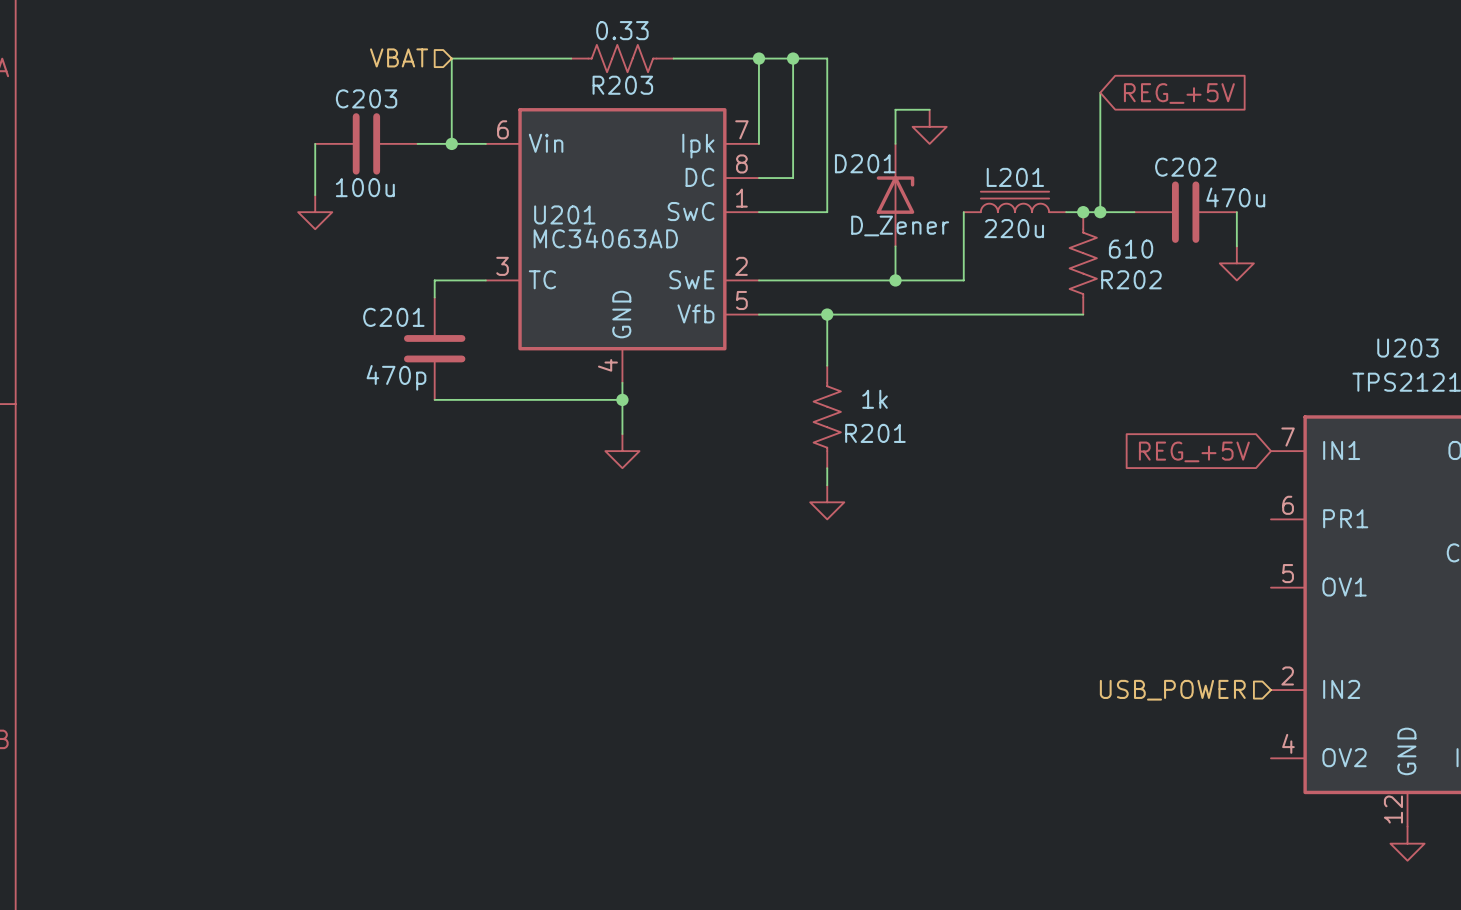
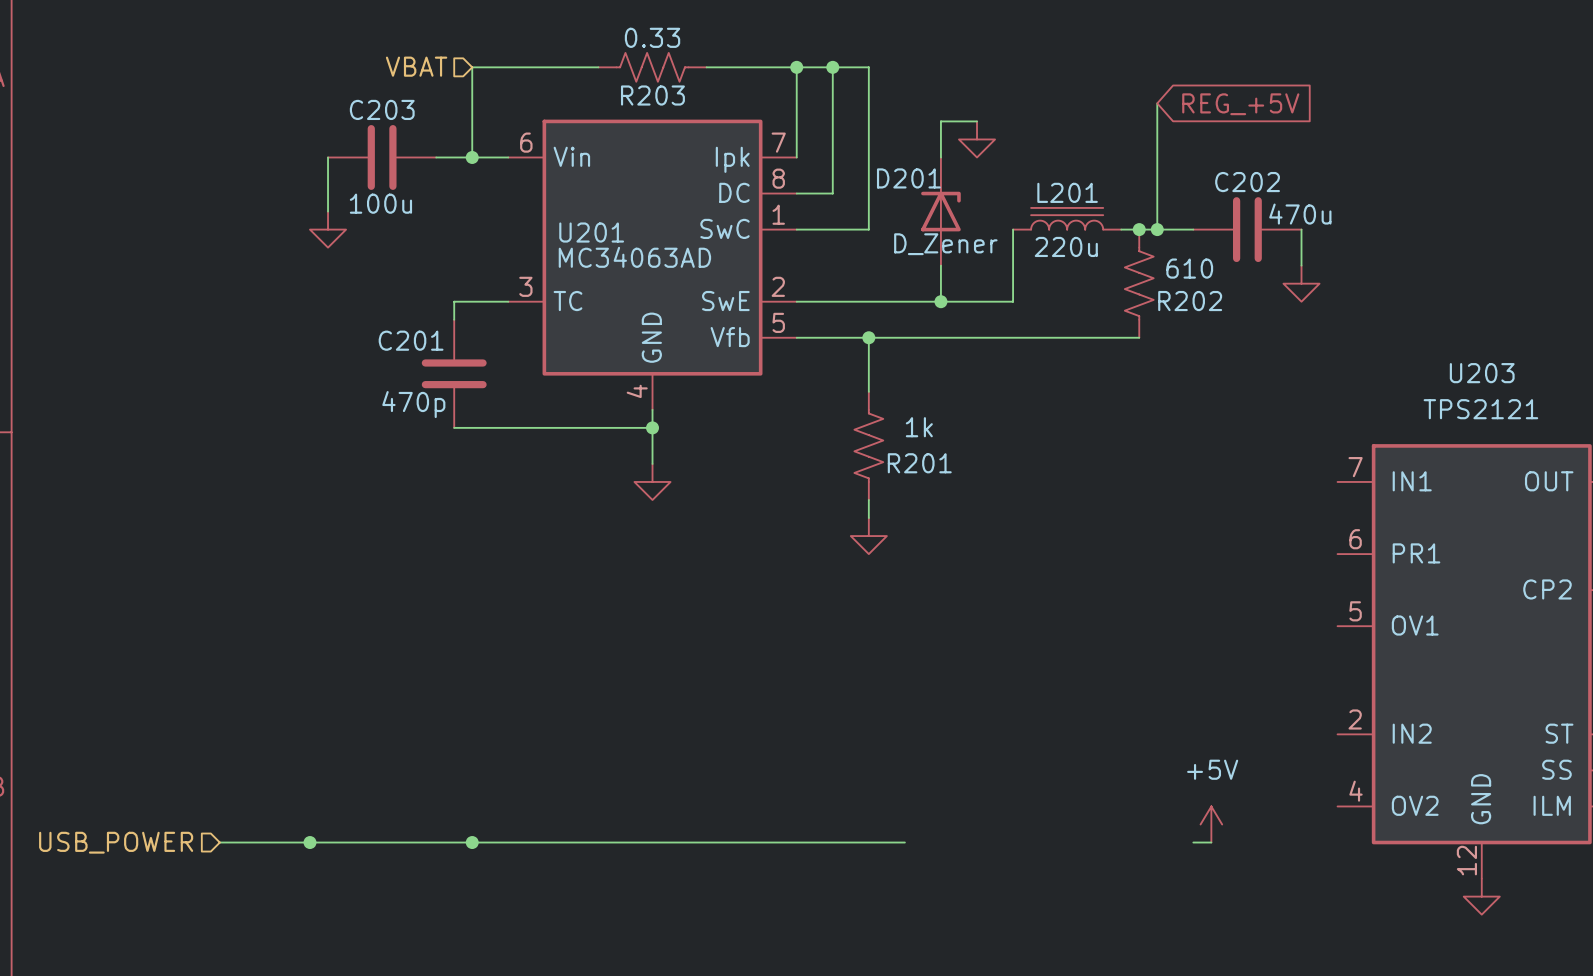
global label: REG_+5V (1194, 451) -> none
hierarchical label: USB_POWER (1172, 690) -> none
power symbol: none -> +5V (1211, 824)
hierarchical label: none -> USB_POWER (116, 842)
wire: none -> (219, 842) (904, 842)
junction: none -> (309, 842)
junction: none -> (472, 842)
wire: none -> (1193, 842) (1211, 842)

